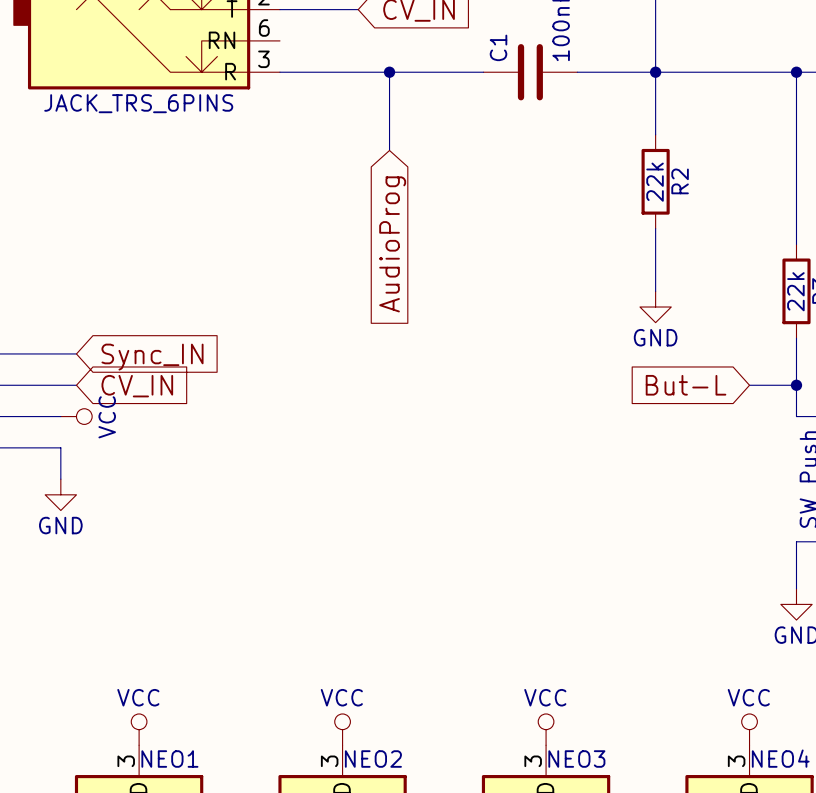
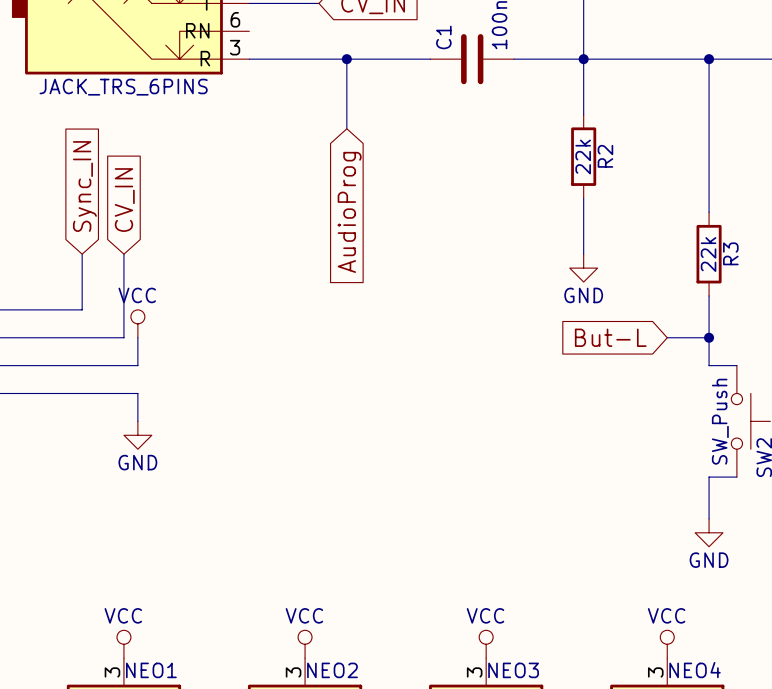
wire: none -> (82, 254) (82, 309) (68, 309)
wire: none -> (123, 254) (123, 337) (68, 337)
global label rotation: 0° (152, 357) -> 90° counterclockwise (84, 186)
wire: none -> (137, 337) (137, 365) (54, 365)
global label rotation: 0° (137, 386) -> 90° counterclockwise (124, 200)
global label position: CV_IN (137, 386) -> CV_IN (124, 200)
power symbol rotation: 0° (76, 416) -> 90° counterclockwise (137, 323)
power symbol position: VCC (76, 416) -> VCC (137, 323)
wire: (60, 447) (60, 479) -> (54, 393) (137, 393) (137, 421)
power symbol position: GND (60, 494) -> GND (137, 435)

